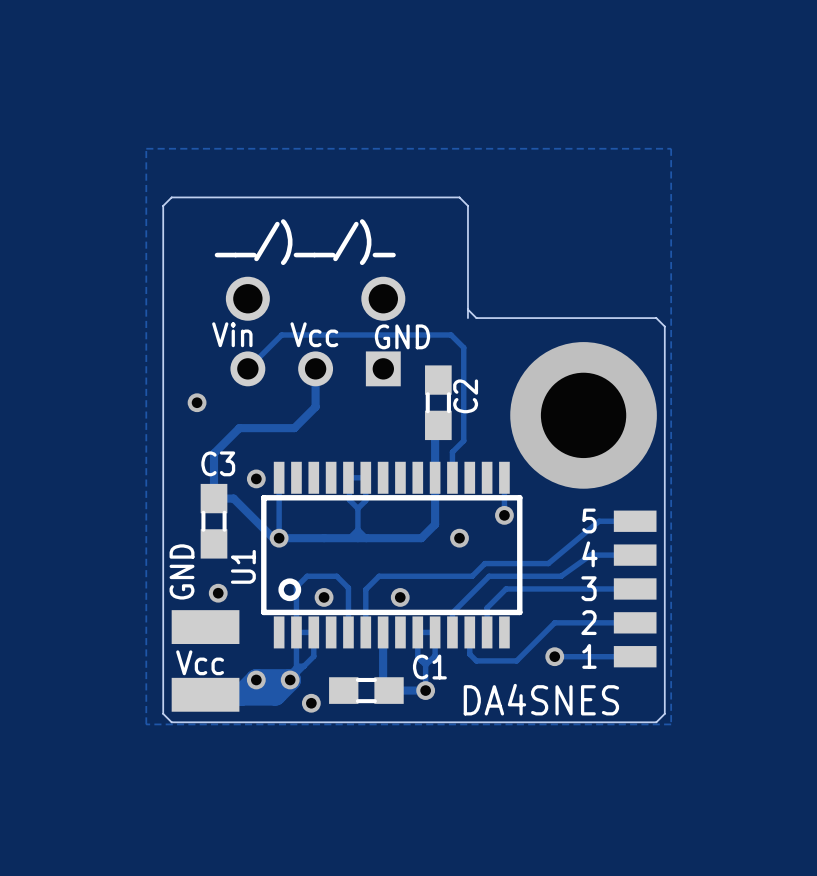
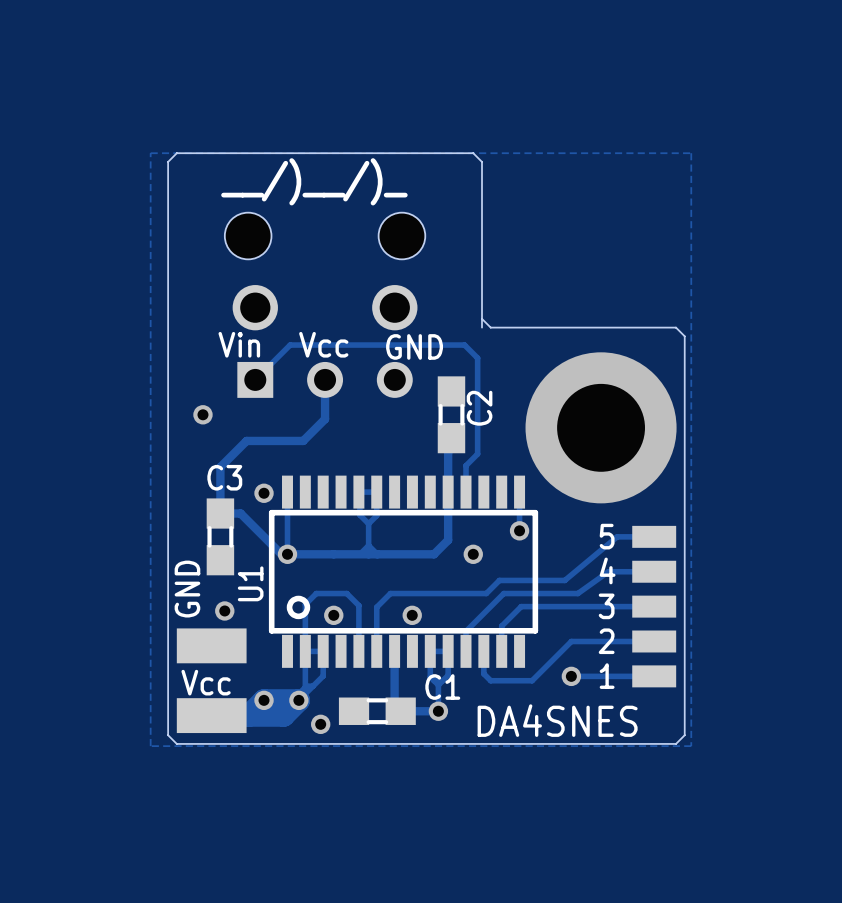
board edge: (163, 205) (171, 197) (459, 197) (467, 205) -> (168, 212) (168, 161) (176, 153) (473, 153) (482, 161) (482, 212)
text position: __/)__/)_ (305, 242) -> __/)__/)_ (314, 181)
part: none -> (325, 305)
part: (315, 331) -> none

